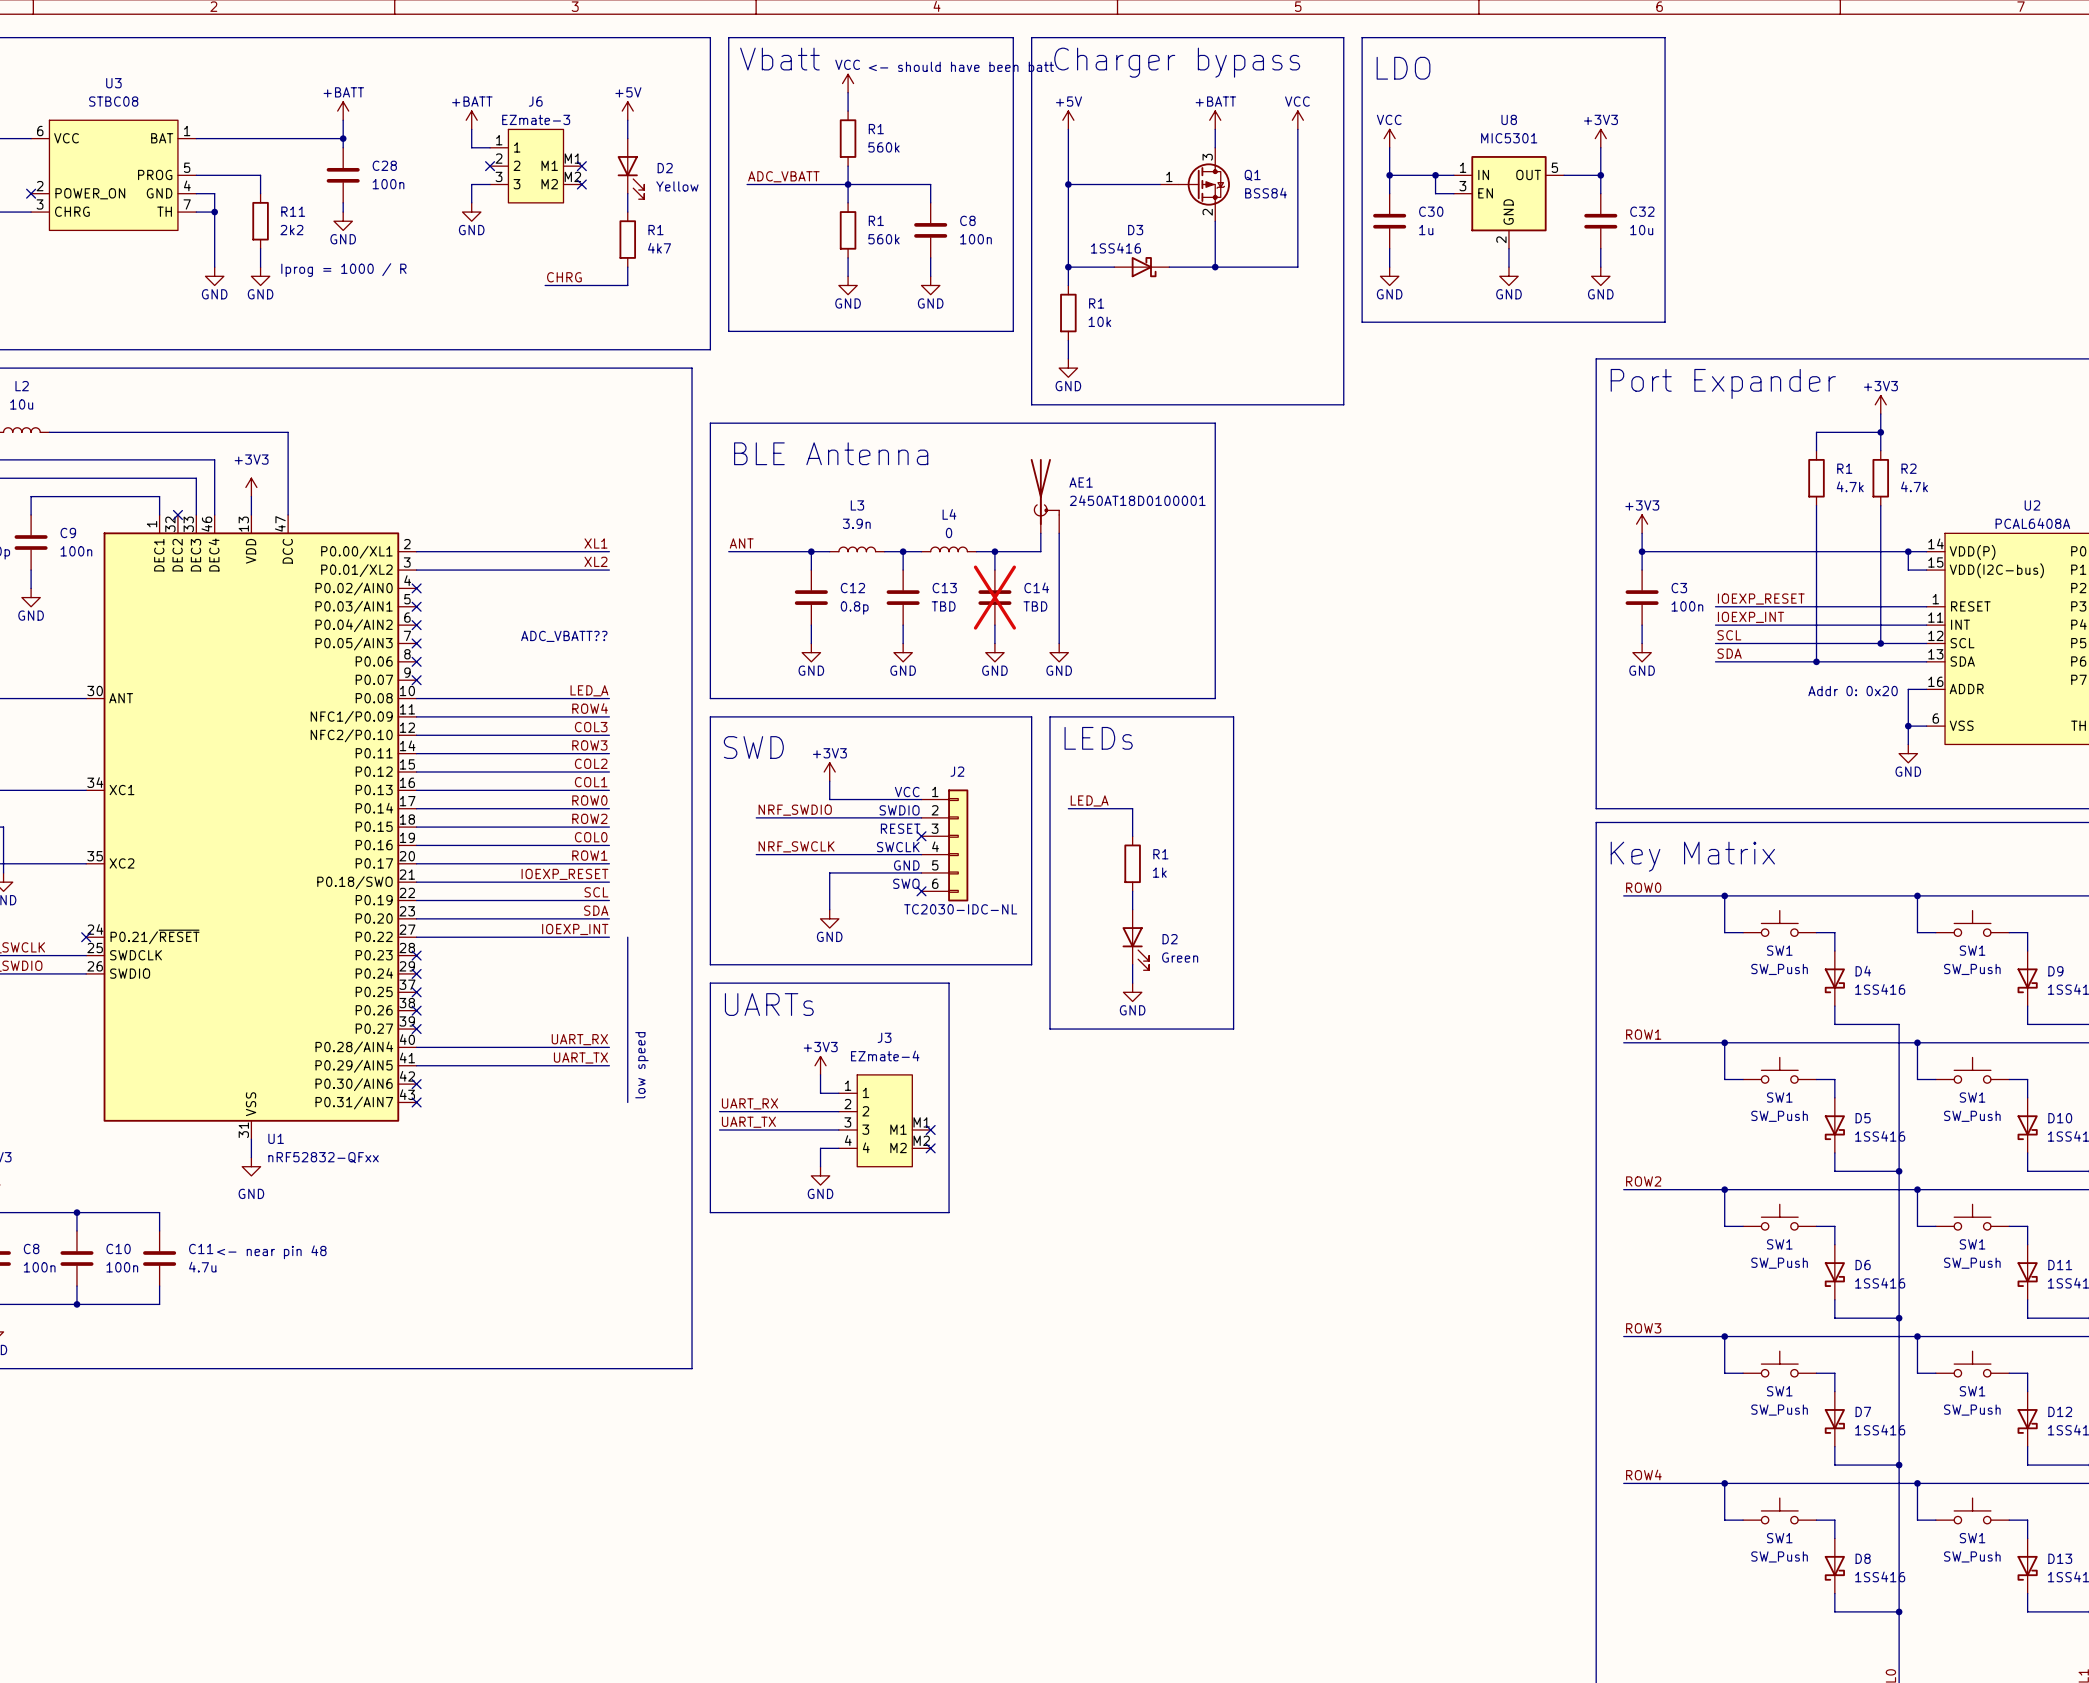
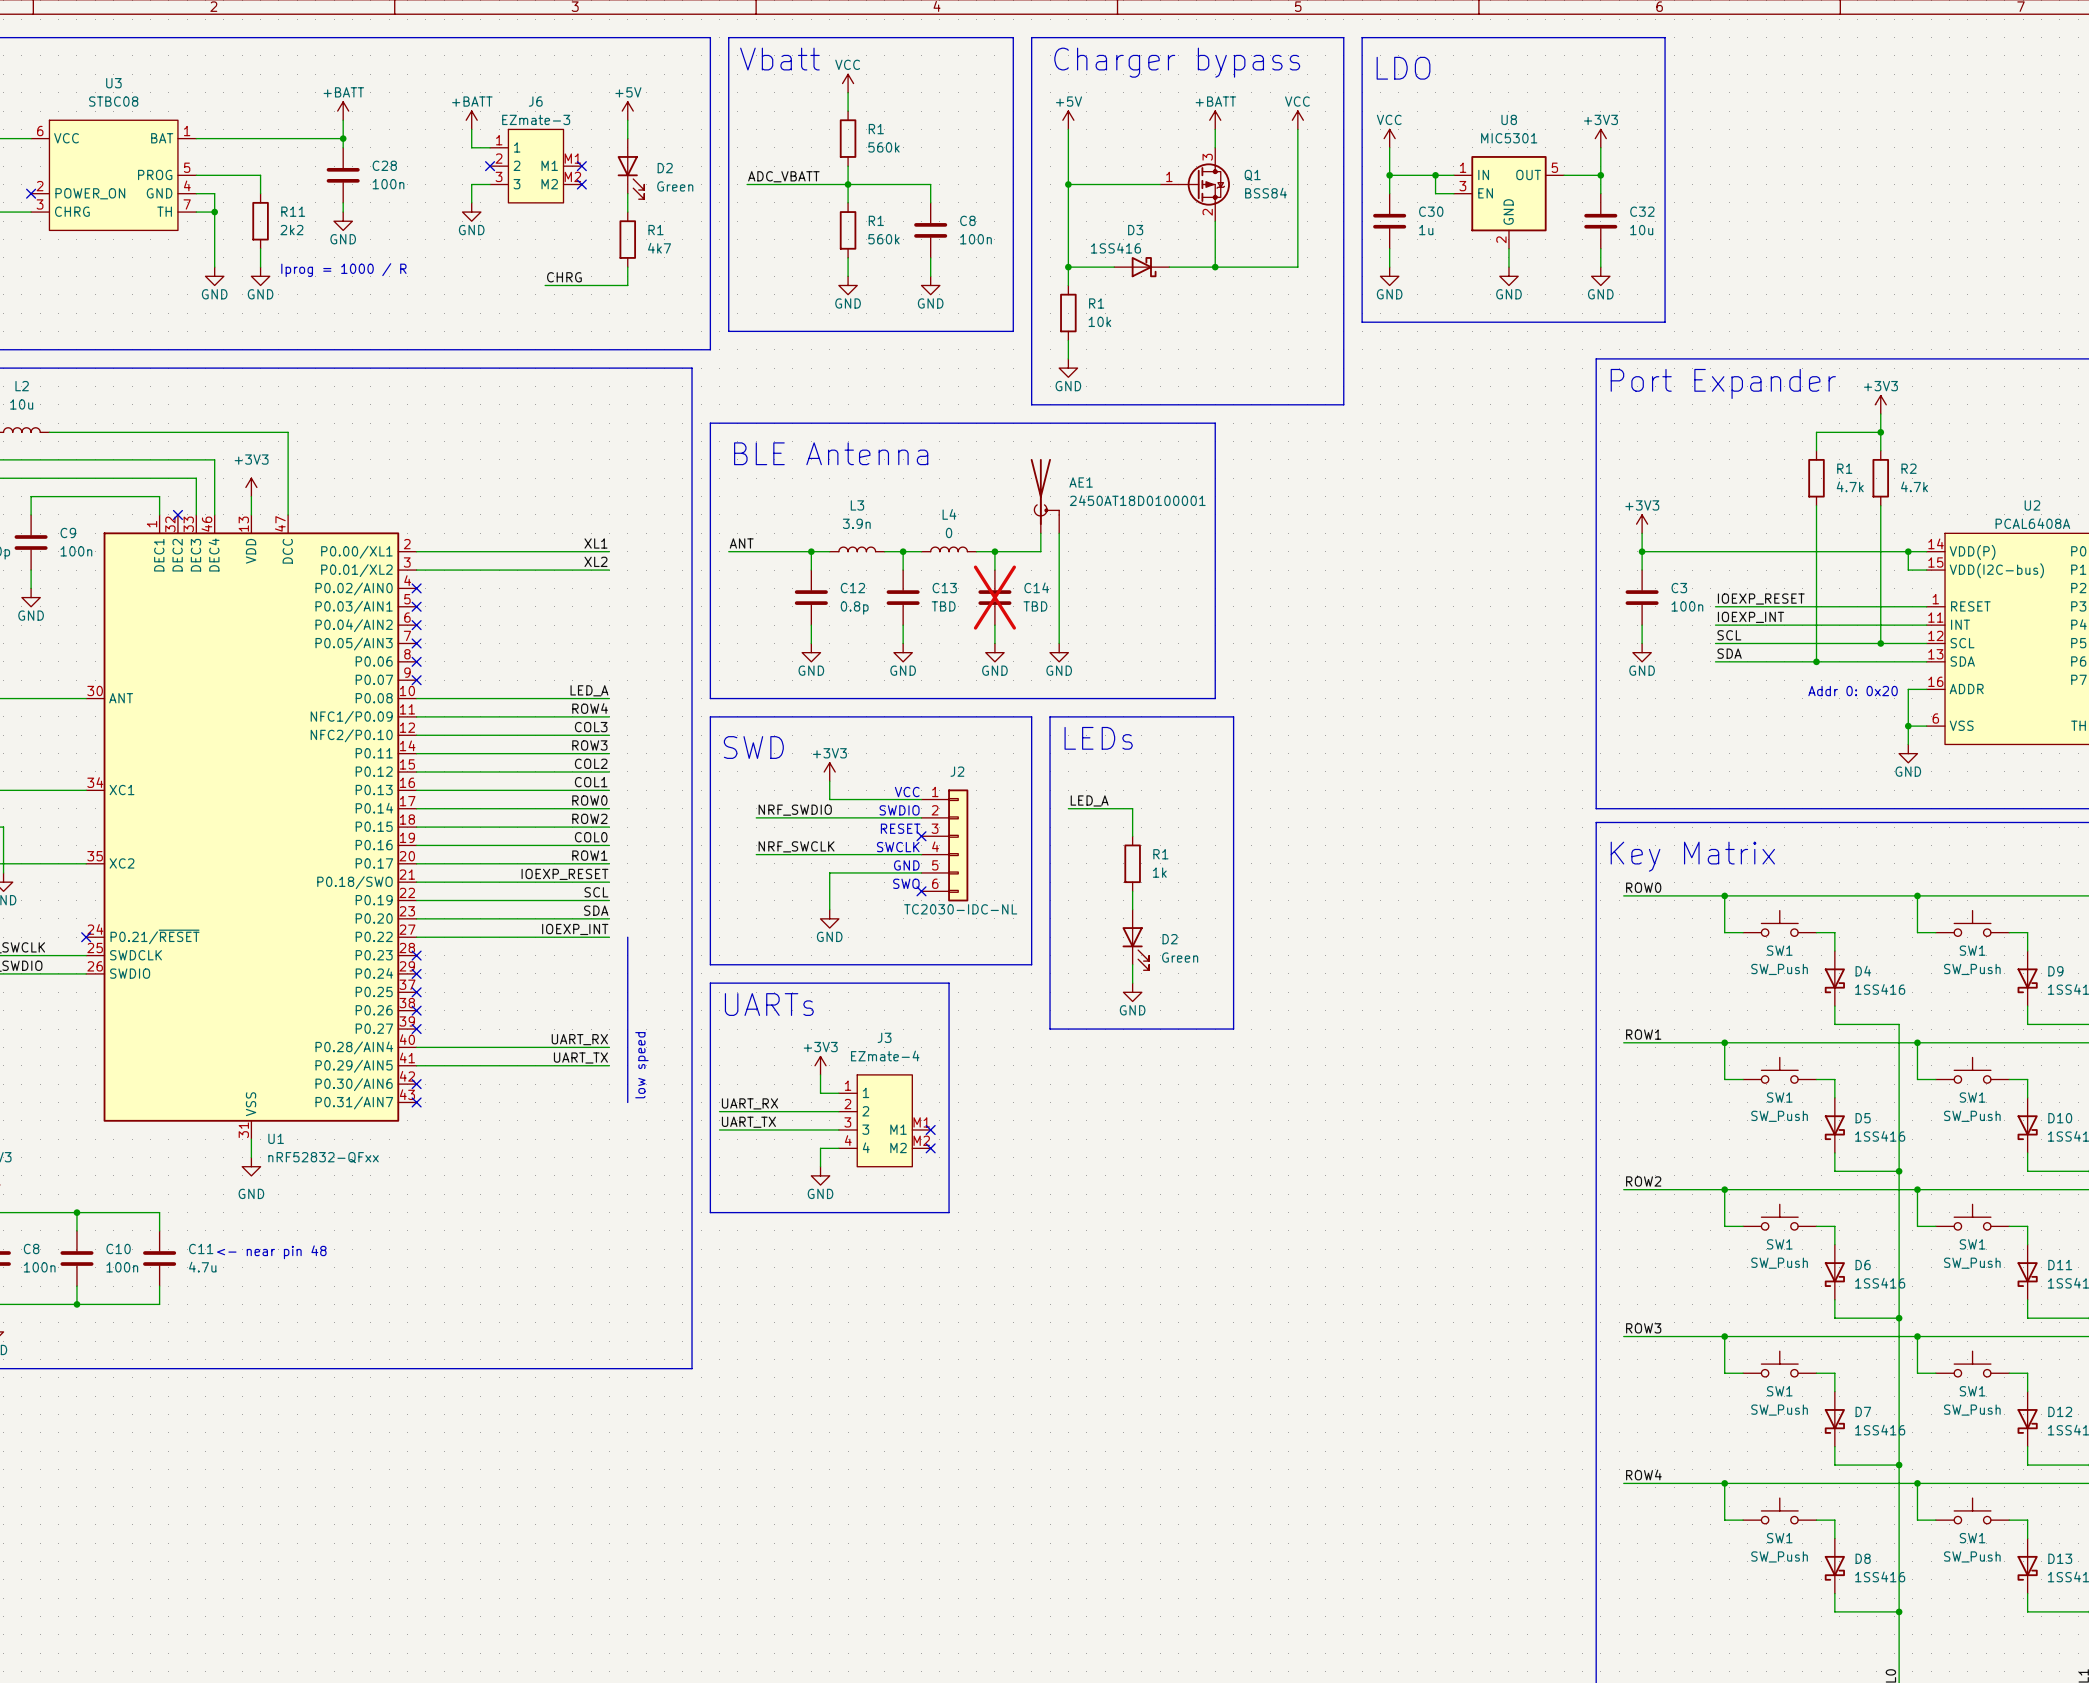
text: <- should have been batt (961, 66) -> none
D2 value: Yellow (677, 186) -> Green (675, 186)
text: ADC_VBATT?? (564, 636) -> none

